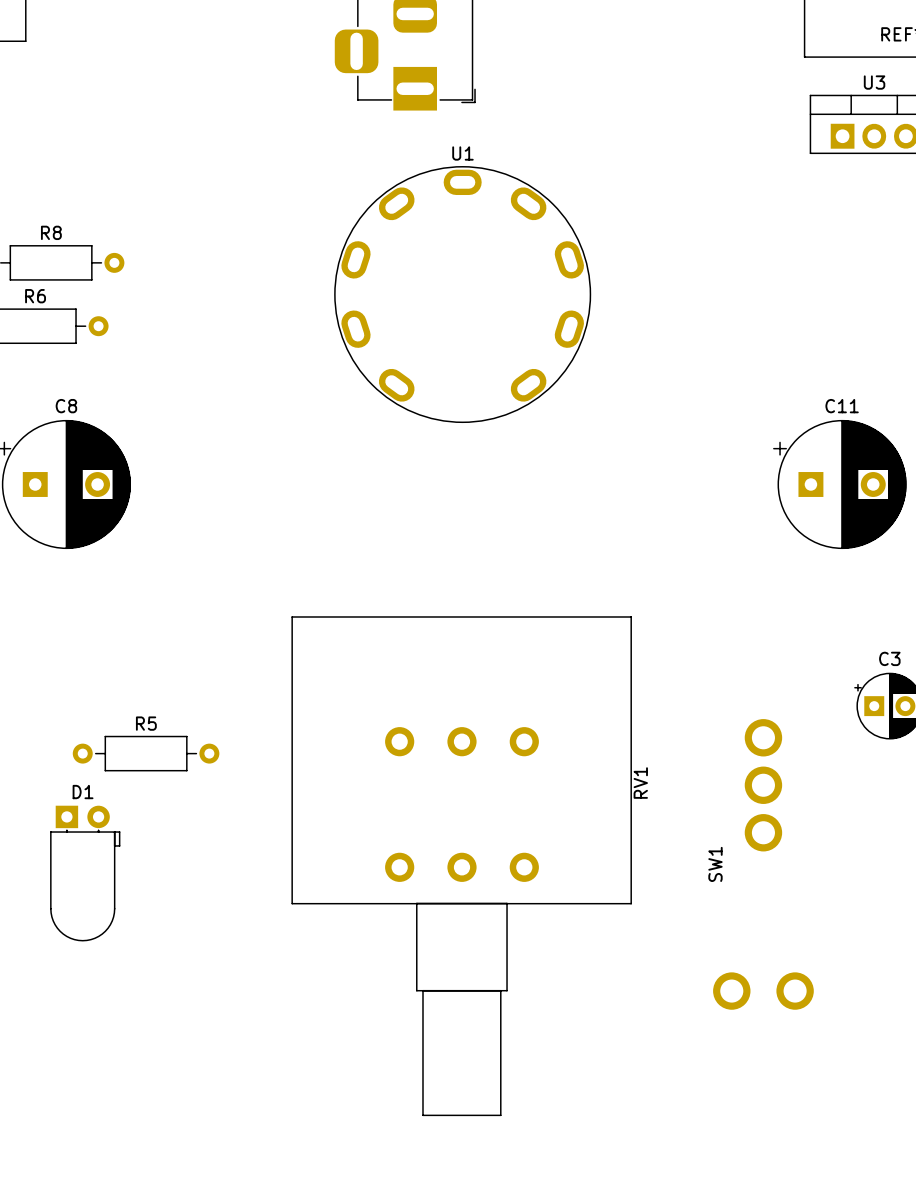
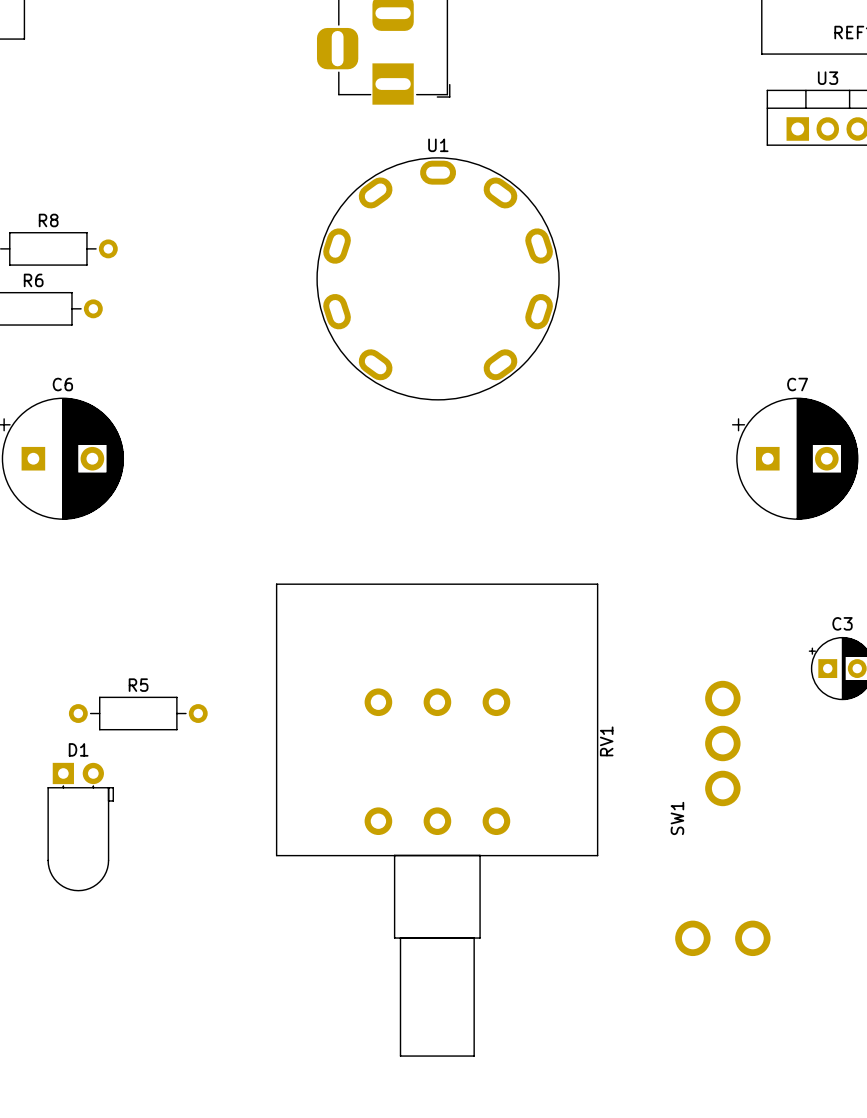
C8 name: C8 (66, 406) -> C6 (62, 384)
C11 name: C11 (842, 406) -> C7 (797, 384)

